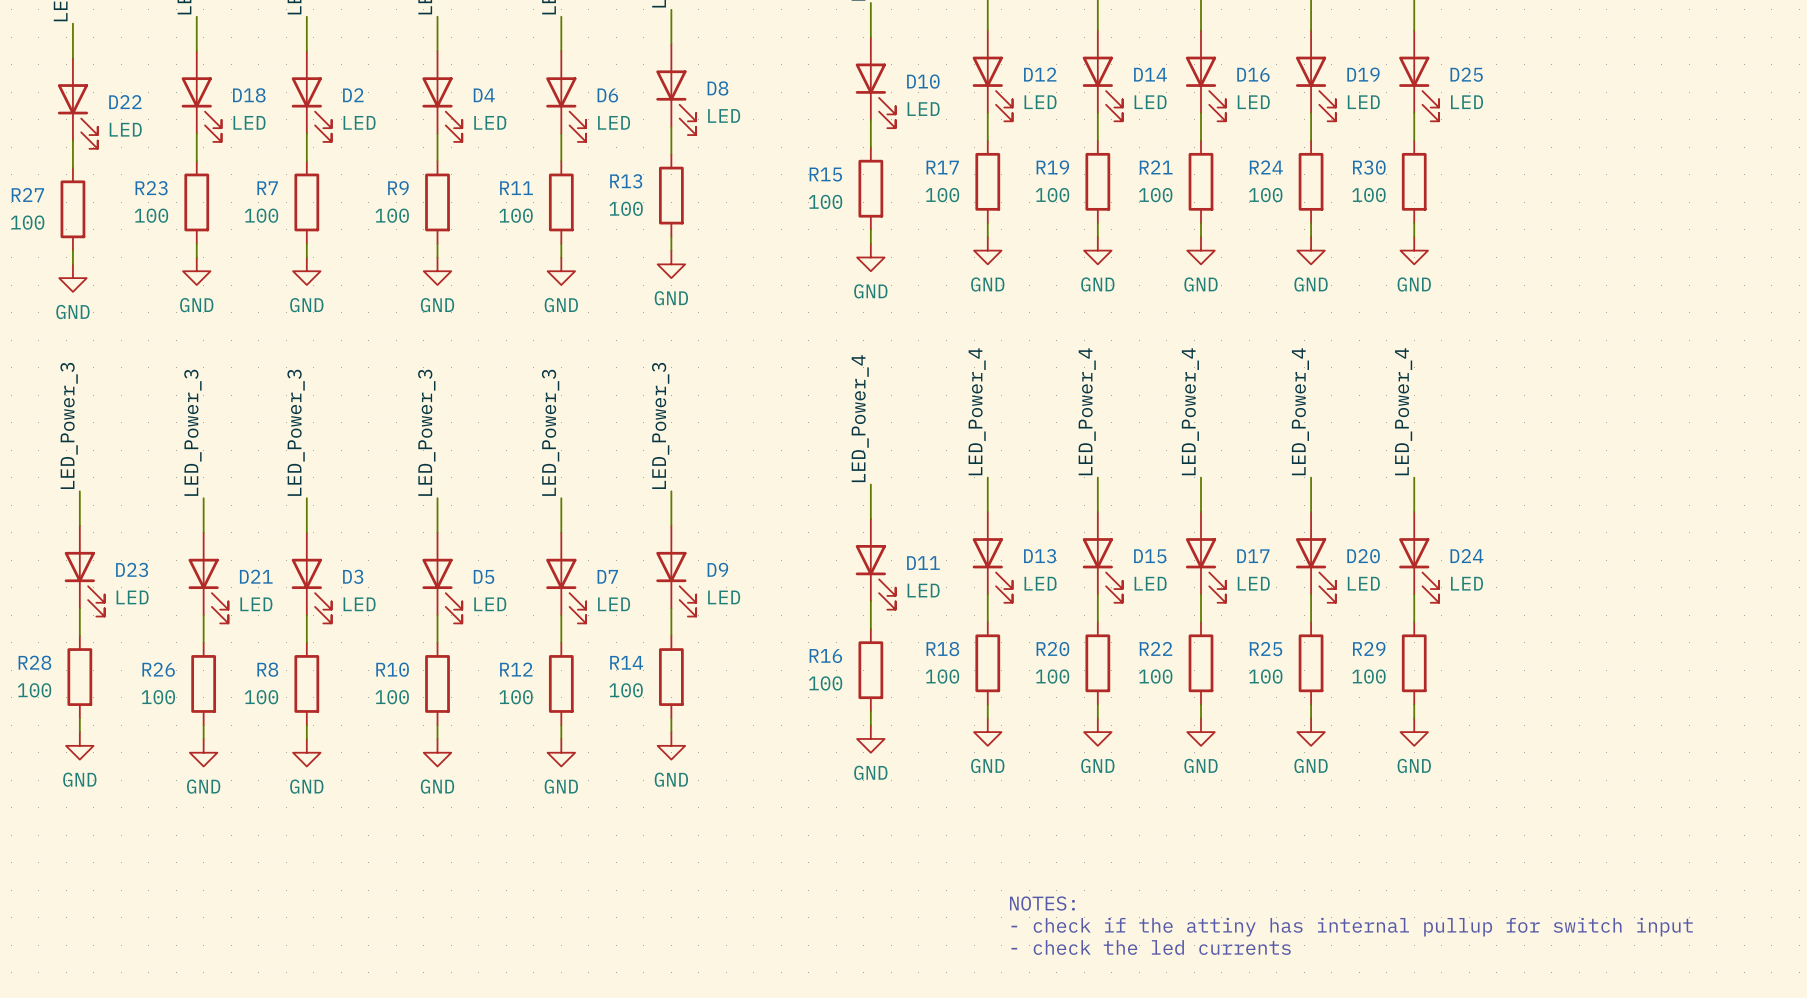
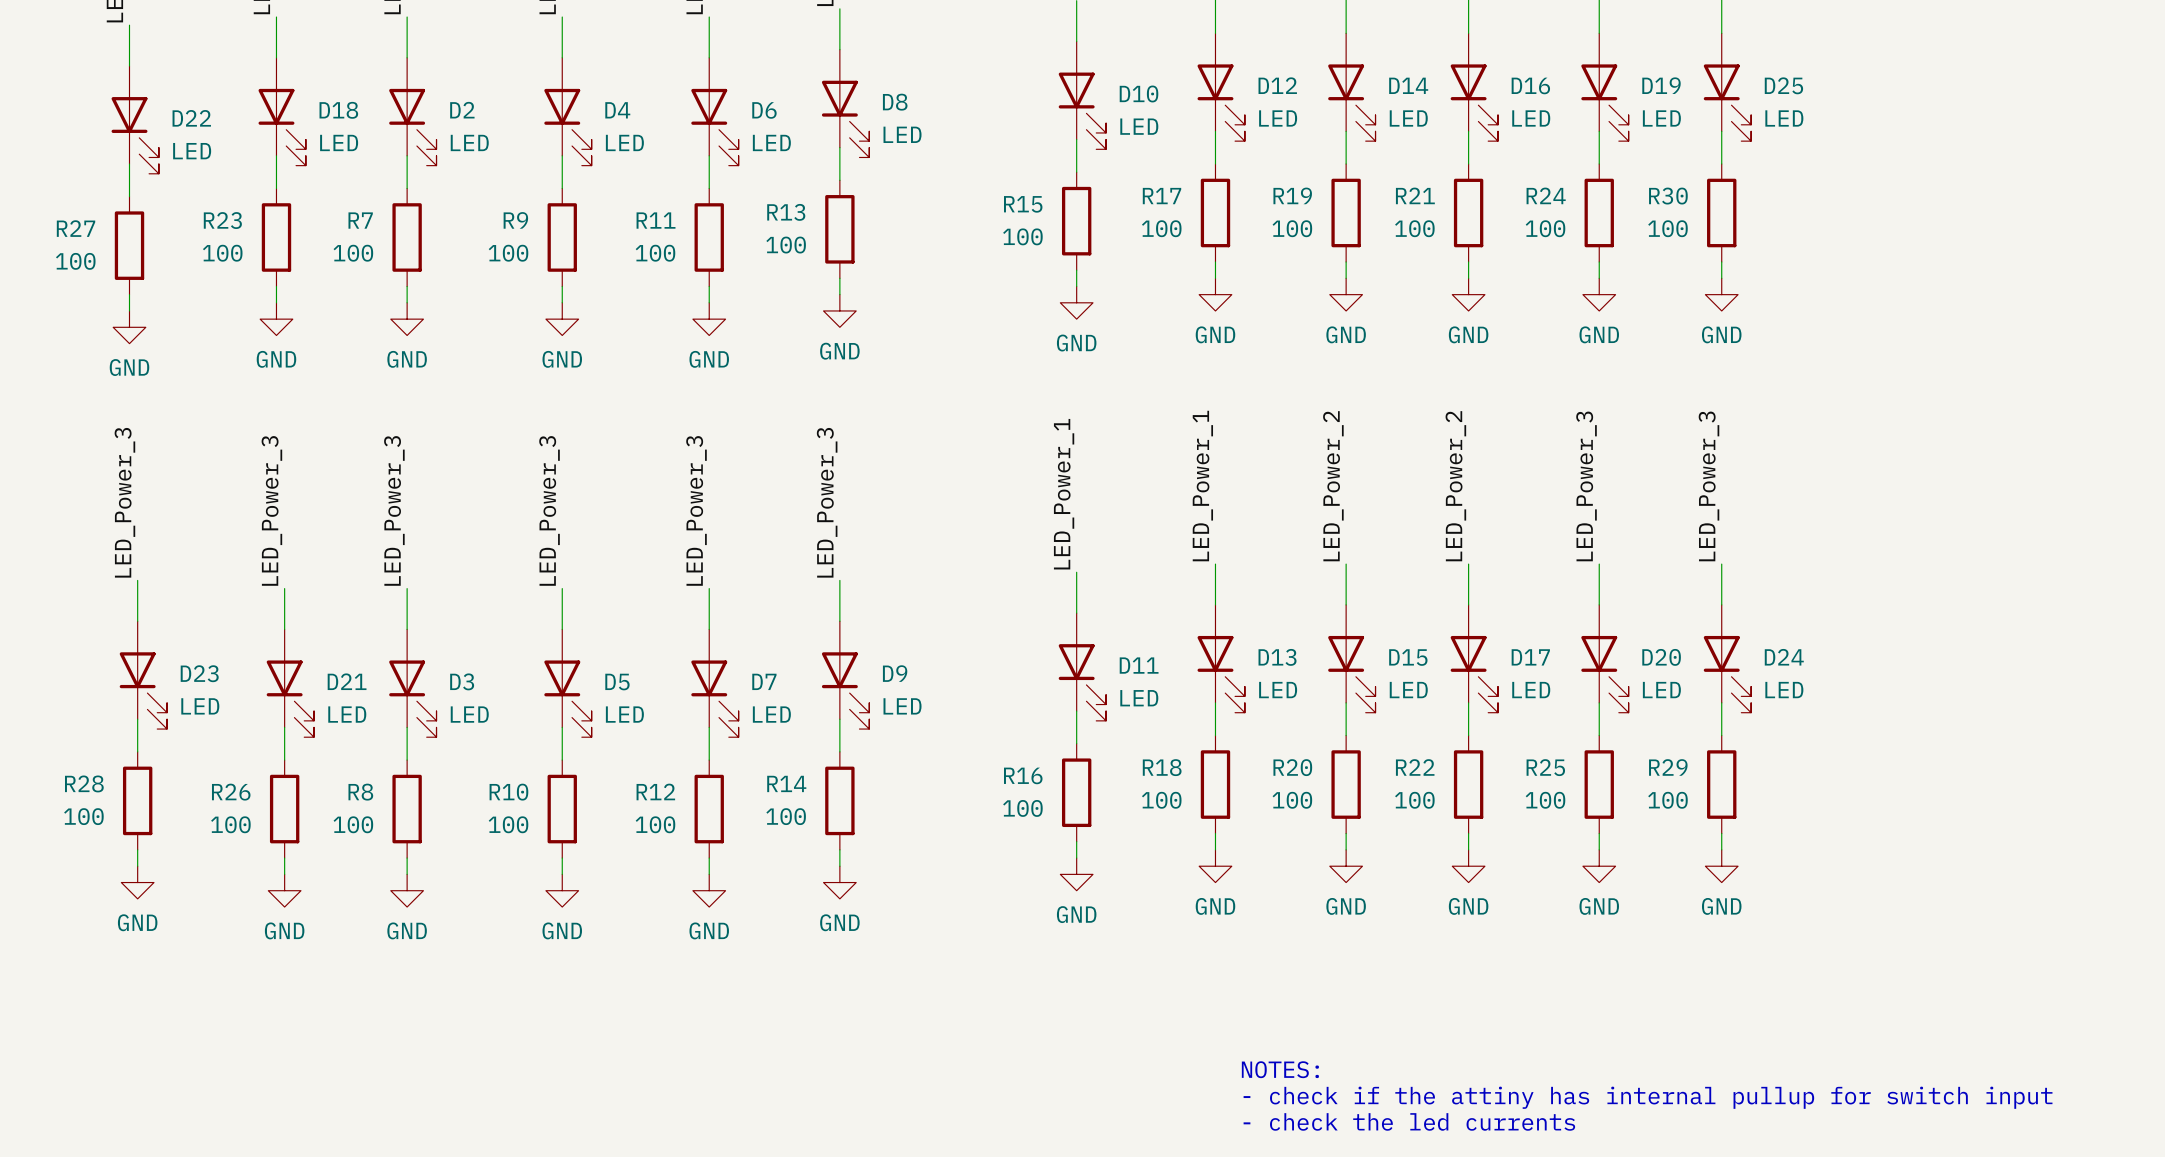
label: LED_Power_4 (977, 411) -> LED_Power_1 (1202, 486)
label: LED_Power_4 (1087, 411) -> LED_Power_2 (1333, 486)
label: LED_Power_4 (1190, 411) -> LED_Power_2 (1455, 486)
label: LED_Power_4 (1300, 411) -> LED_Power_3 (1586, 486)
label: LED_Power_4 (1403, 411) -> LED_Power_3 (1708, 486)
label: LED_Power_4 (860, 418) -> LED_Power_1 (1064, 494)

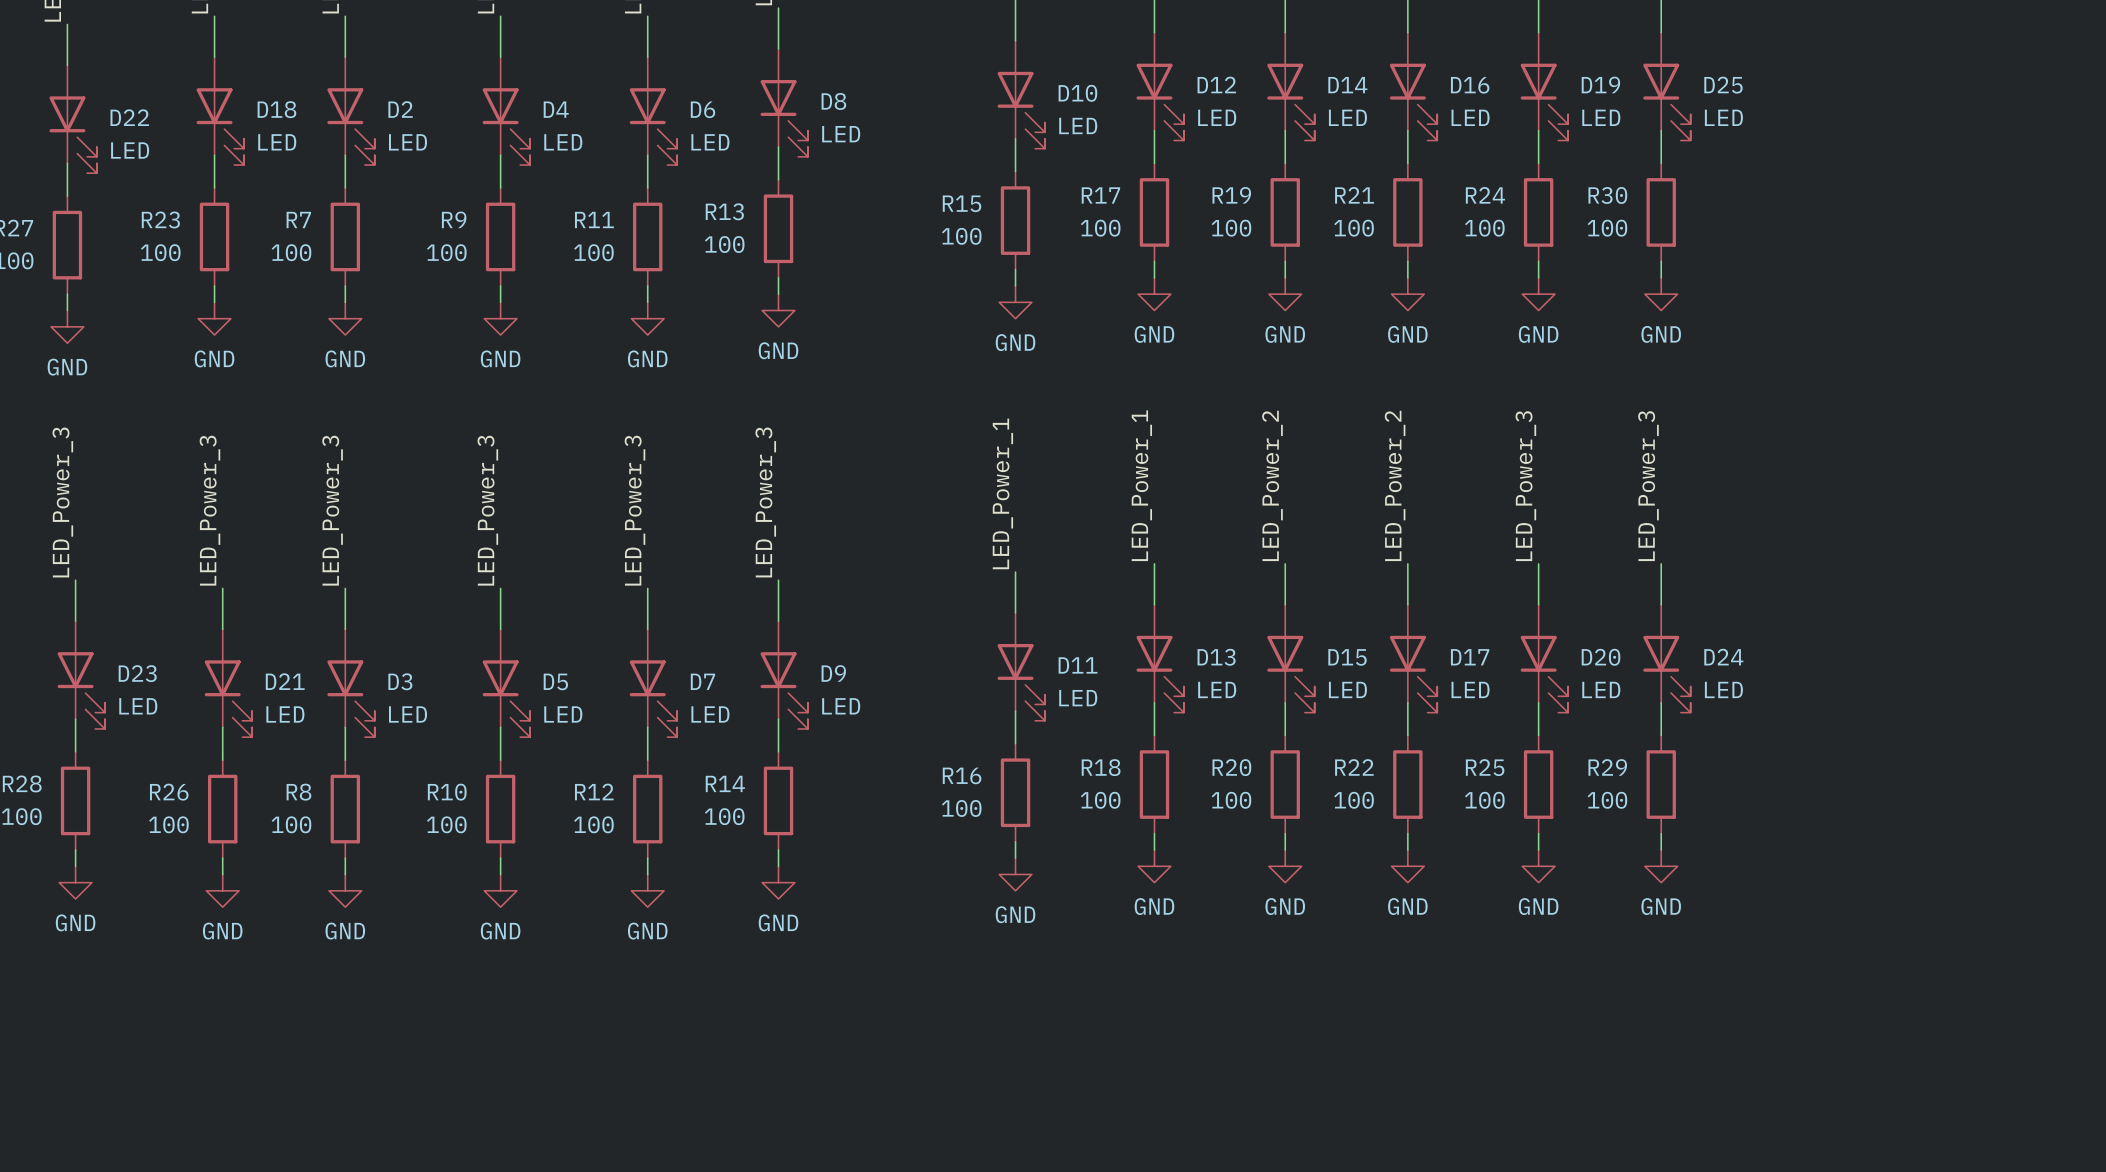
text: NOTES: (1280, 1069) -> none
text: - check if the attiny has internal pullup for switch input (1648, 1097) -> none
text: - check the led currents (1409, 1121) -> none

